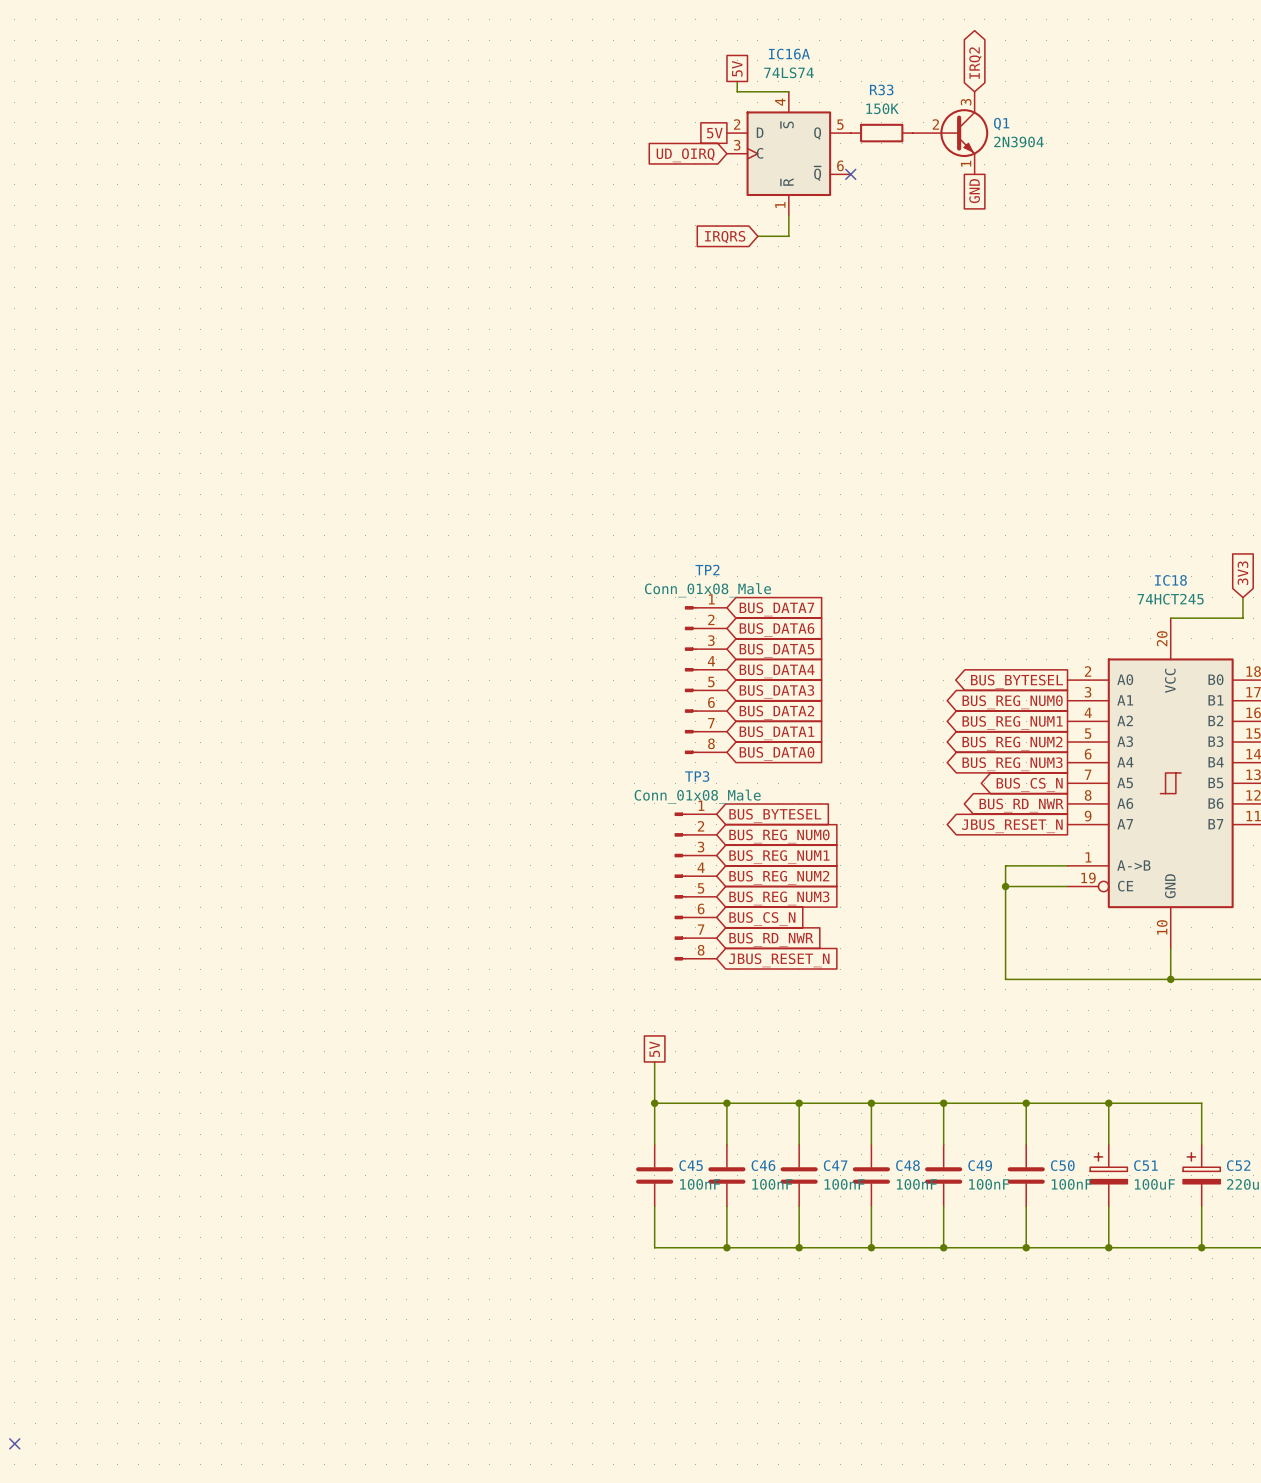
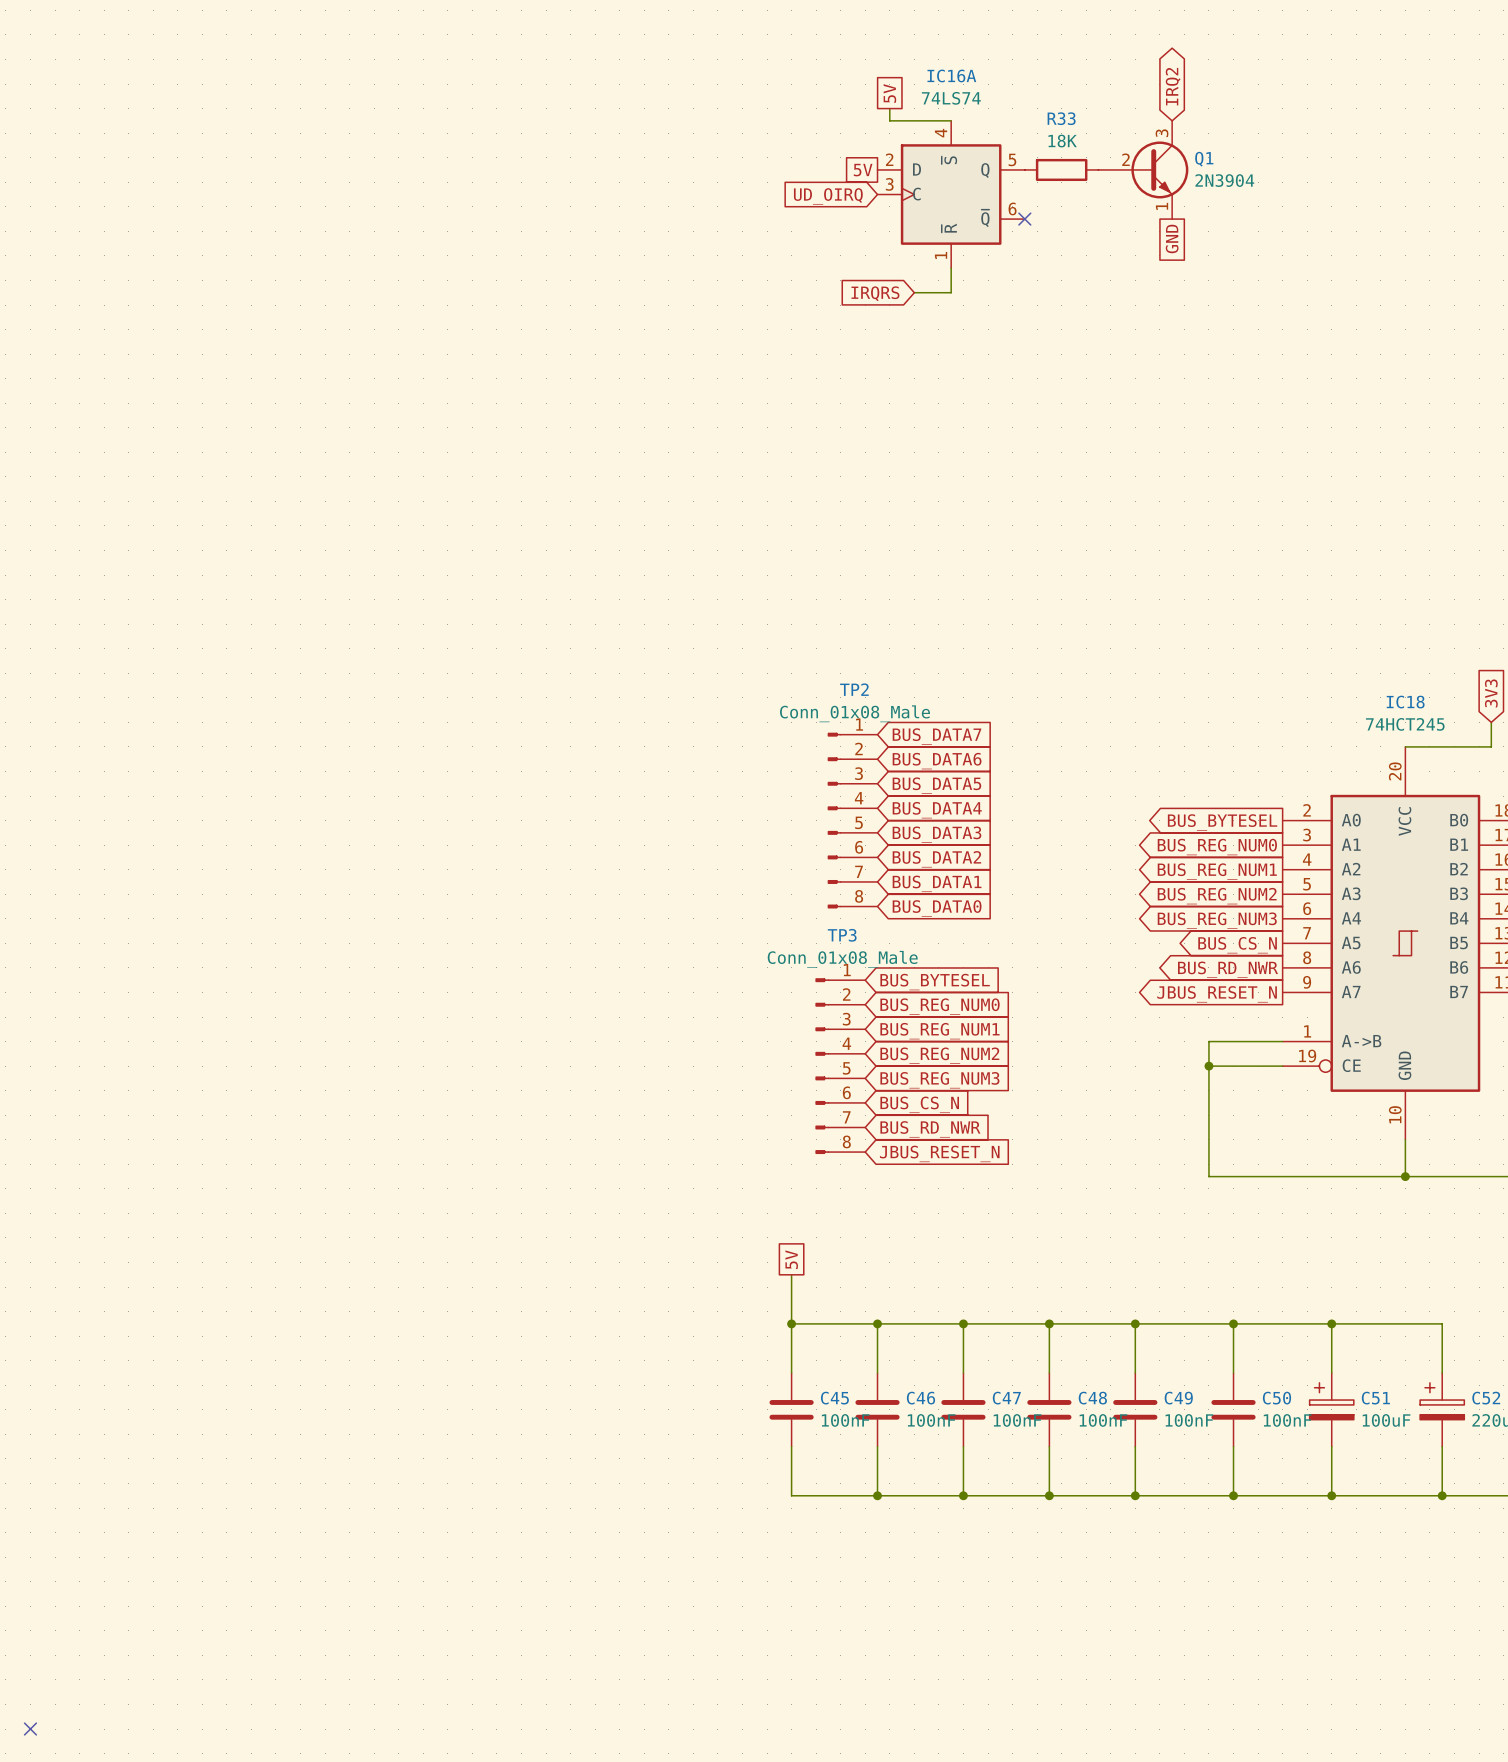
R33 value: 150K (882, 108) -> 18K (1062, 141)

